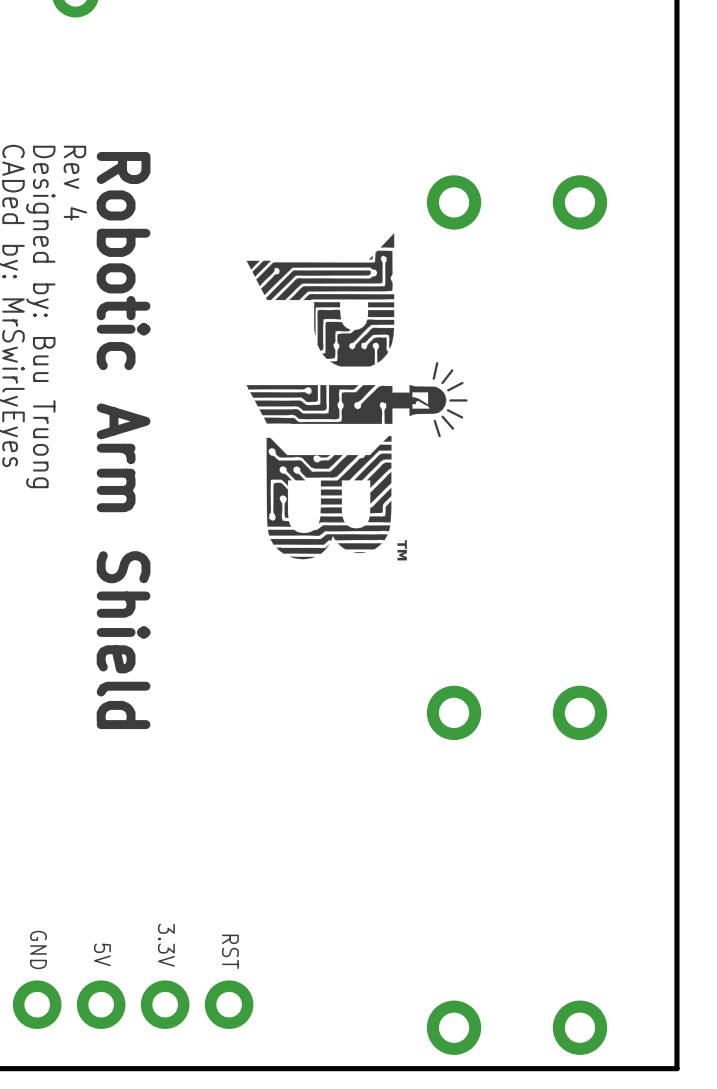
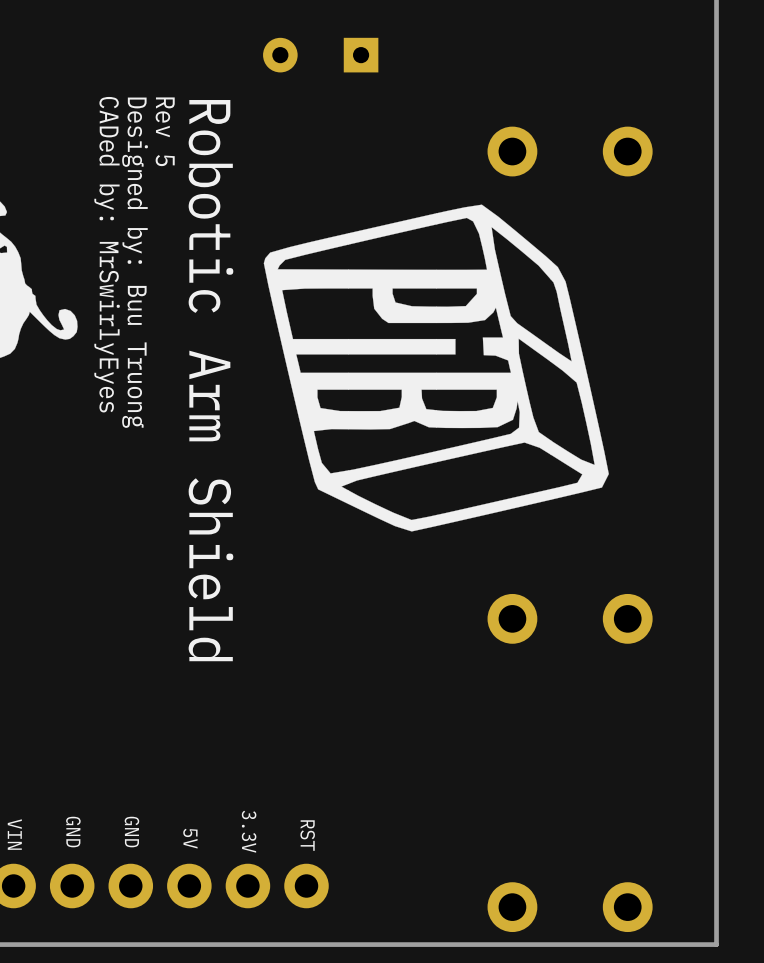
part: none -> (320, 55)
text: Rev 4 (75, 183) -> Rev 5 (165, 131)
drawing: [246, 233, 468, 561] -> none
drawing: none -> [263, 204, 609, 532]

